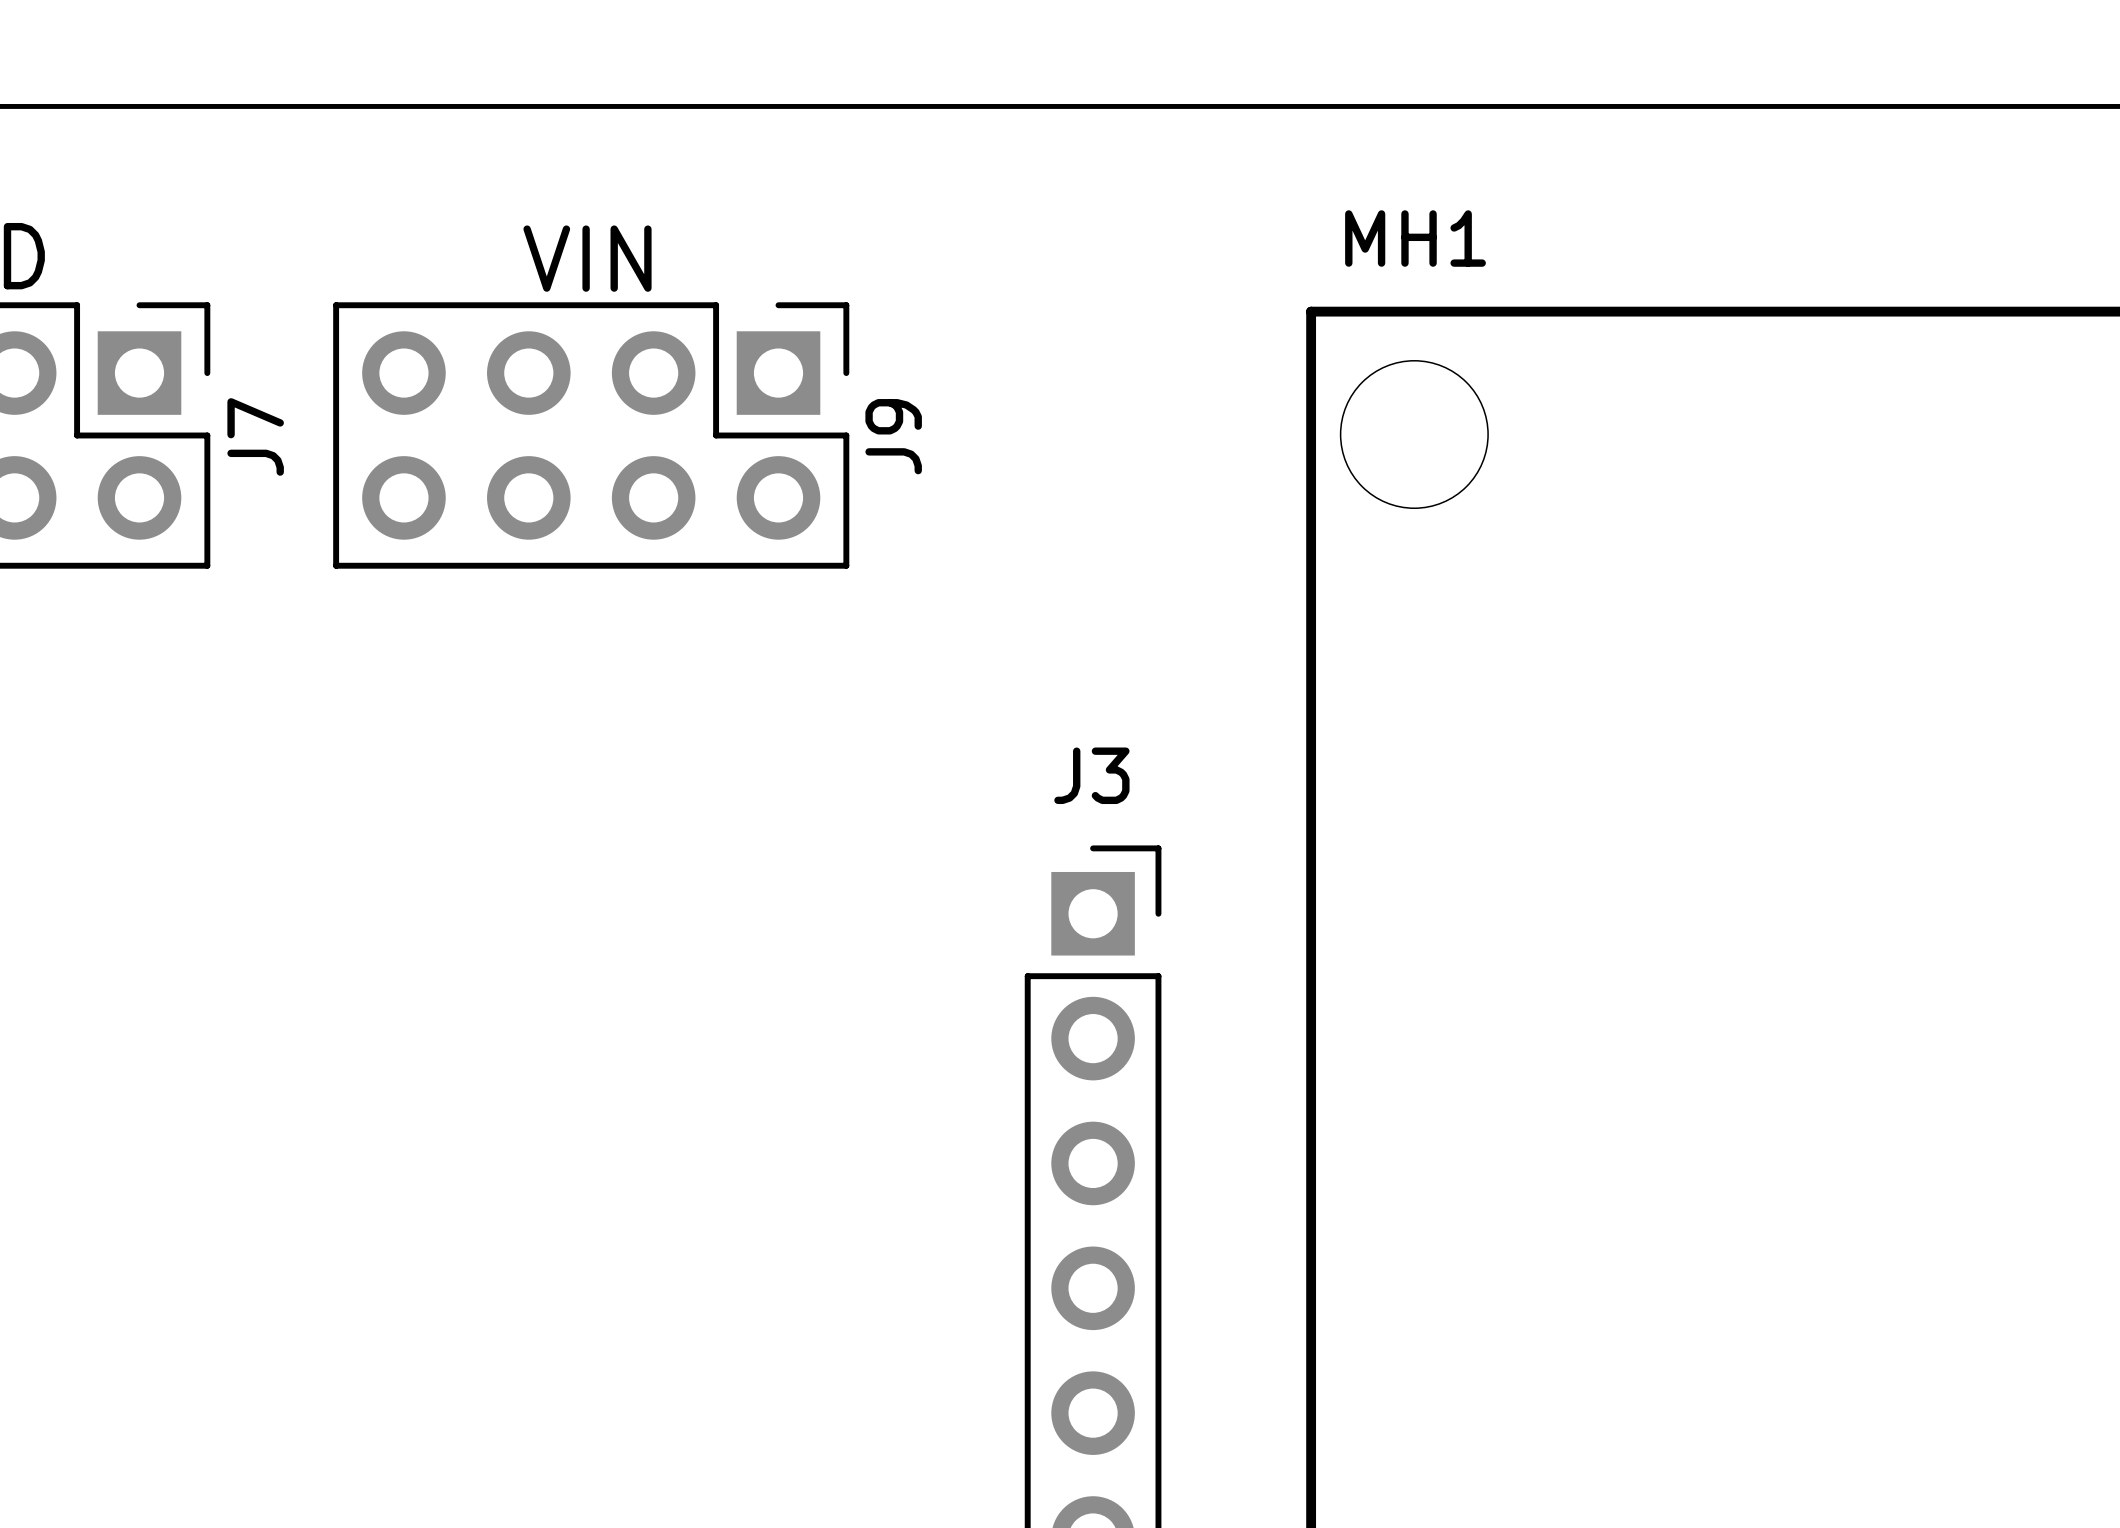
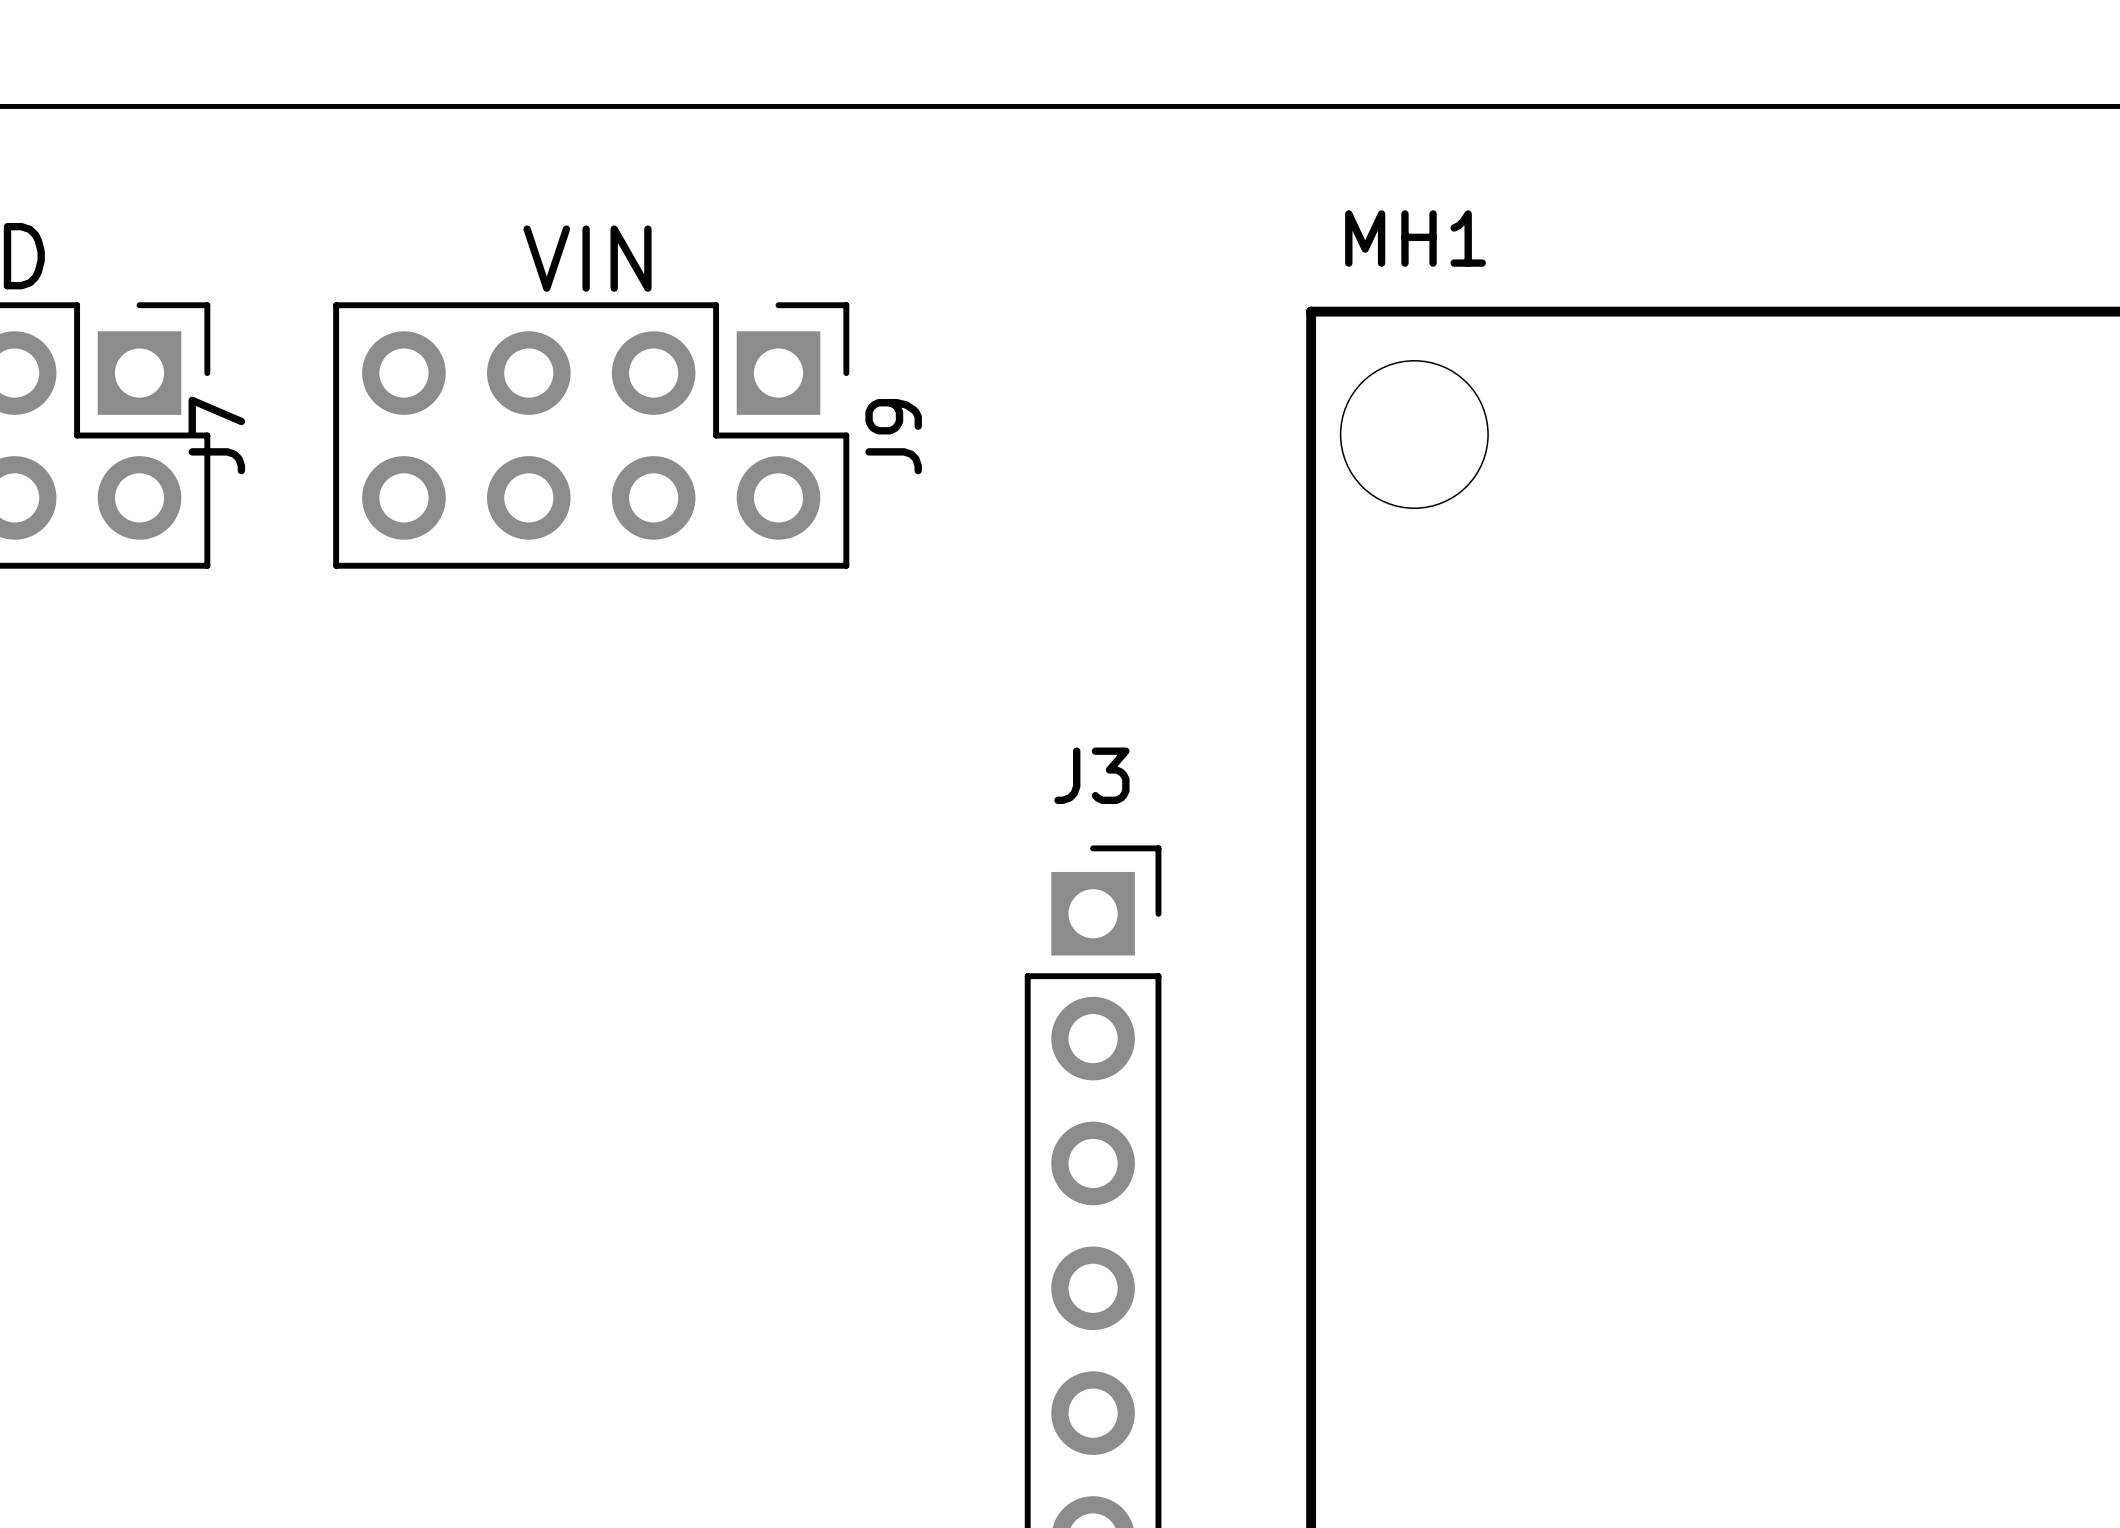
J7 name position: J7 (255, 436) -> J7 (216, 435)

